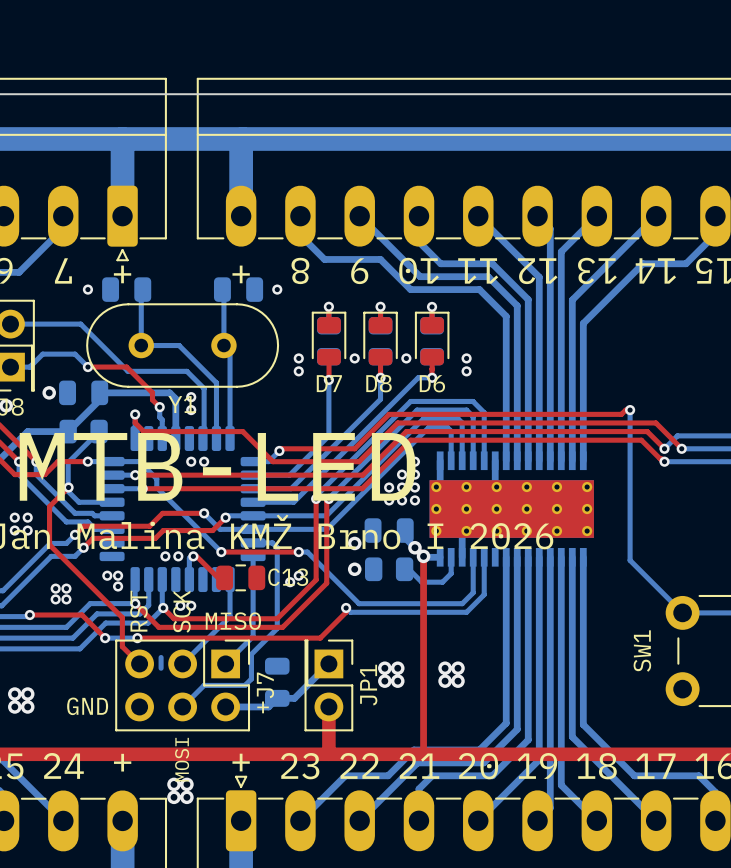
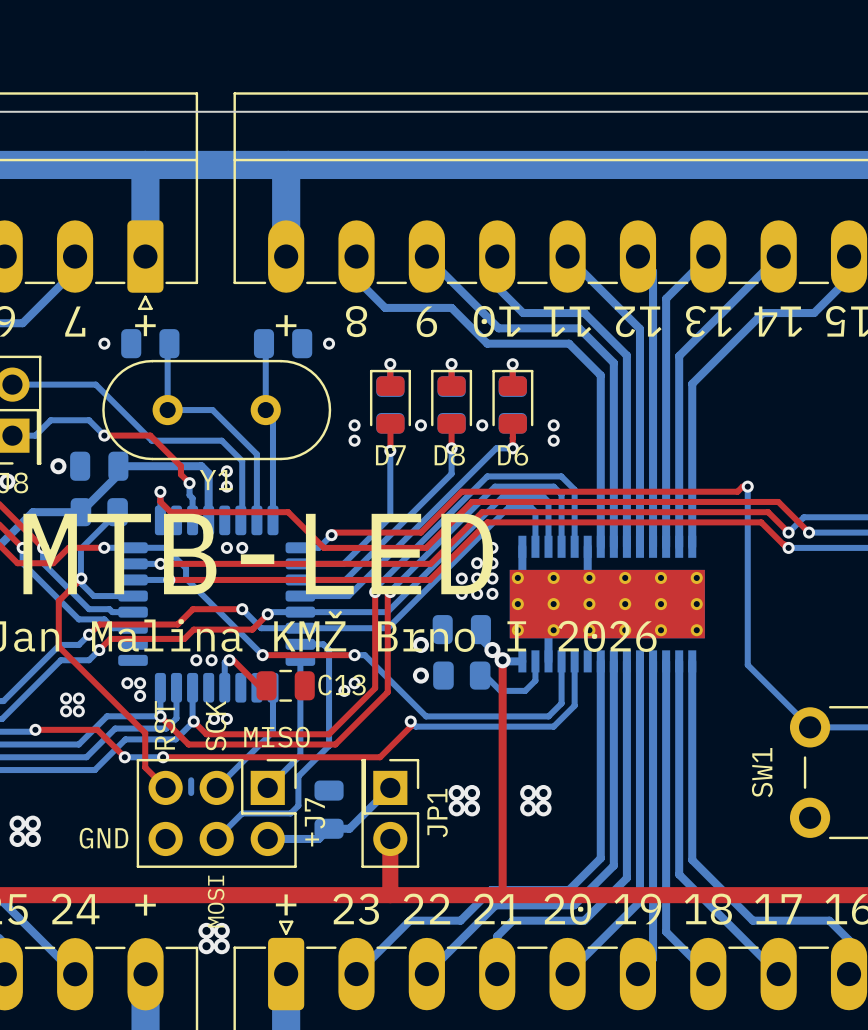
via: (14, 517) -> none
via: (27, 517) -> none
via: (14, 530) -> none
via: (27, 530) -> none

